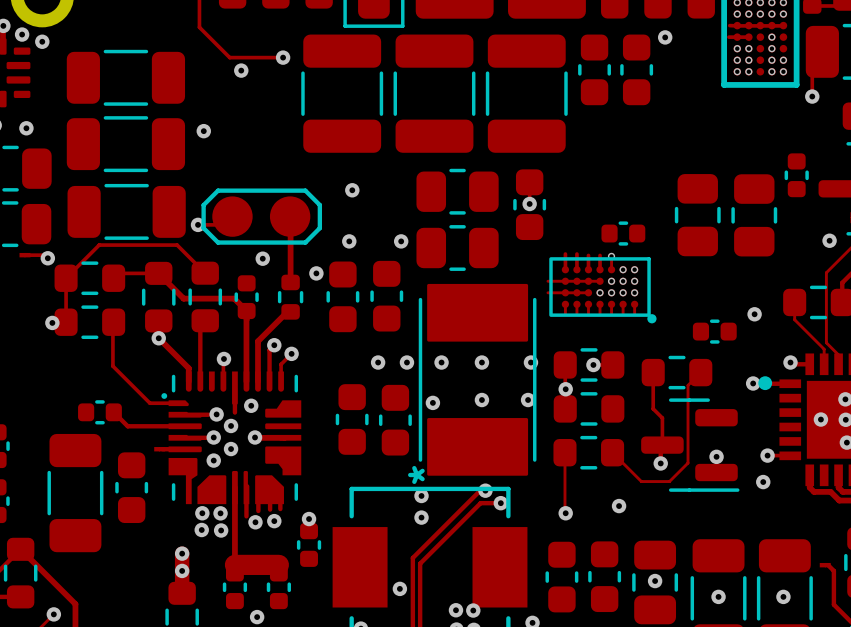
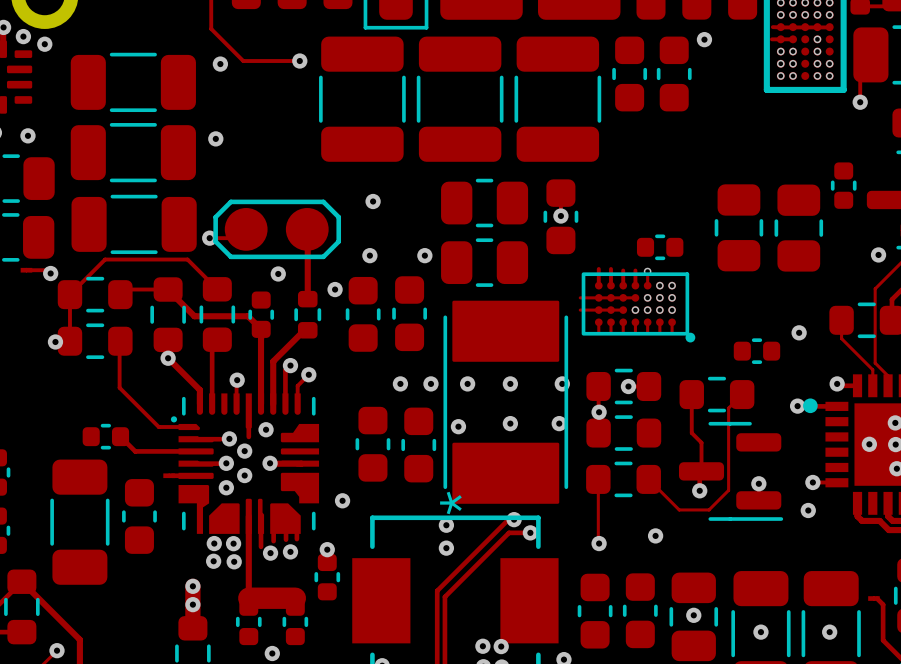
via position: (241, 70) -> (220, 64)
via position: (399, 588) -> (342, 500)

